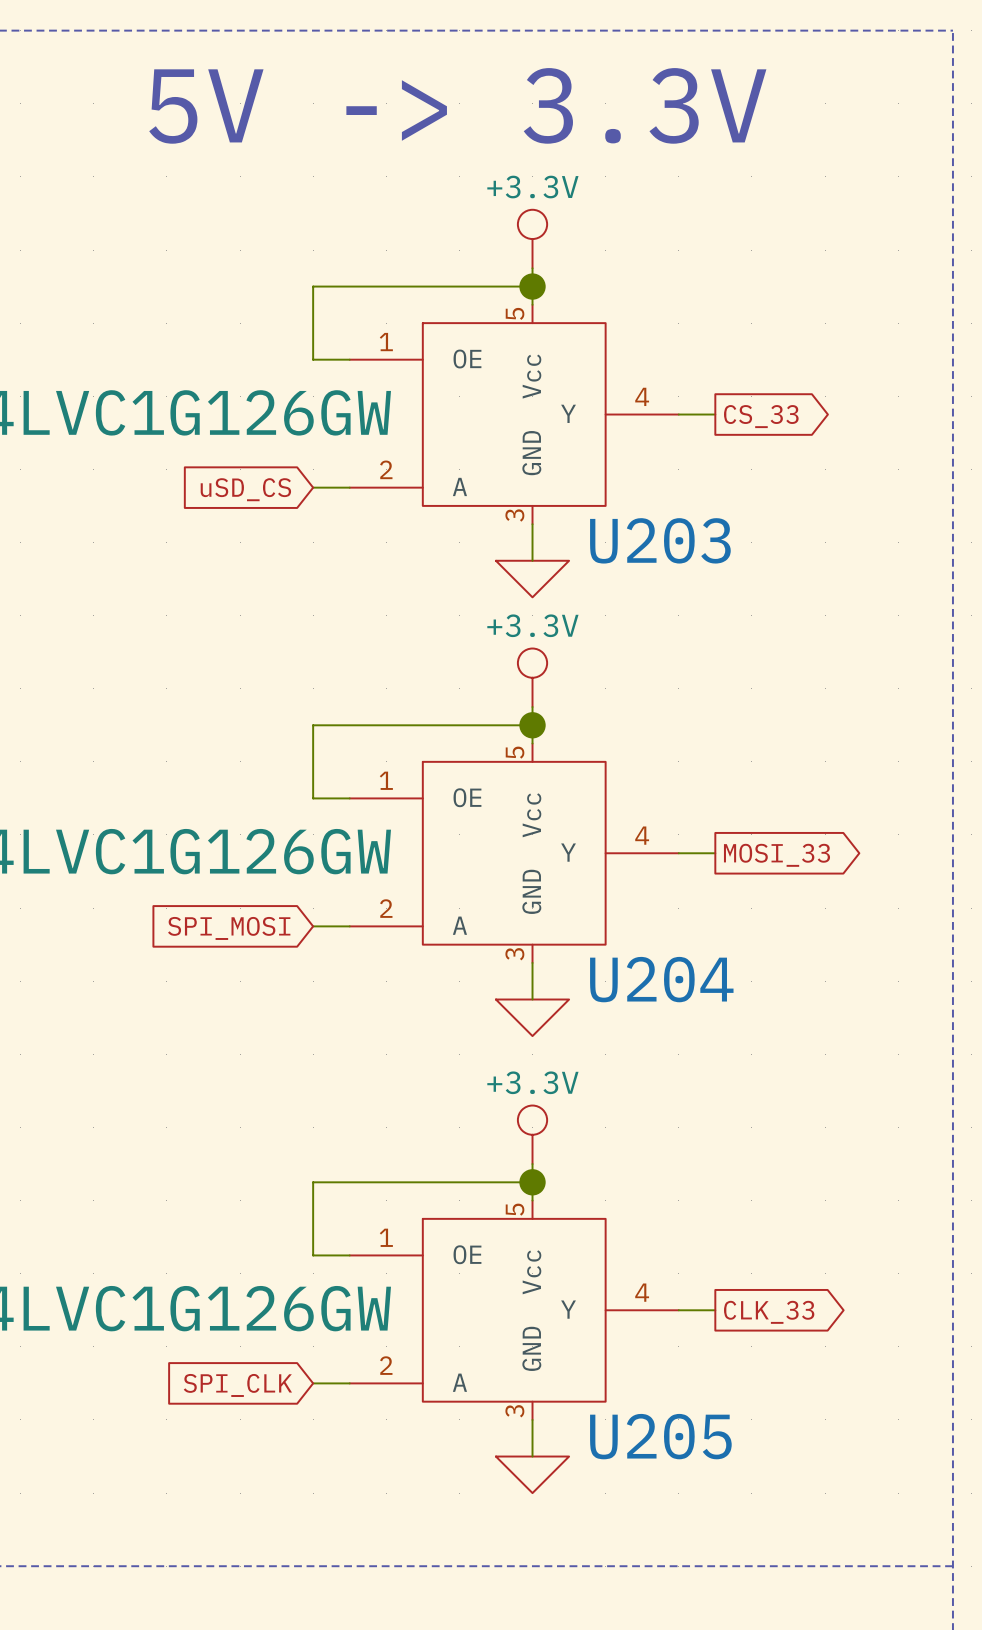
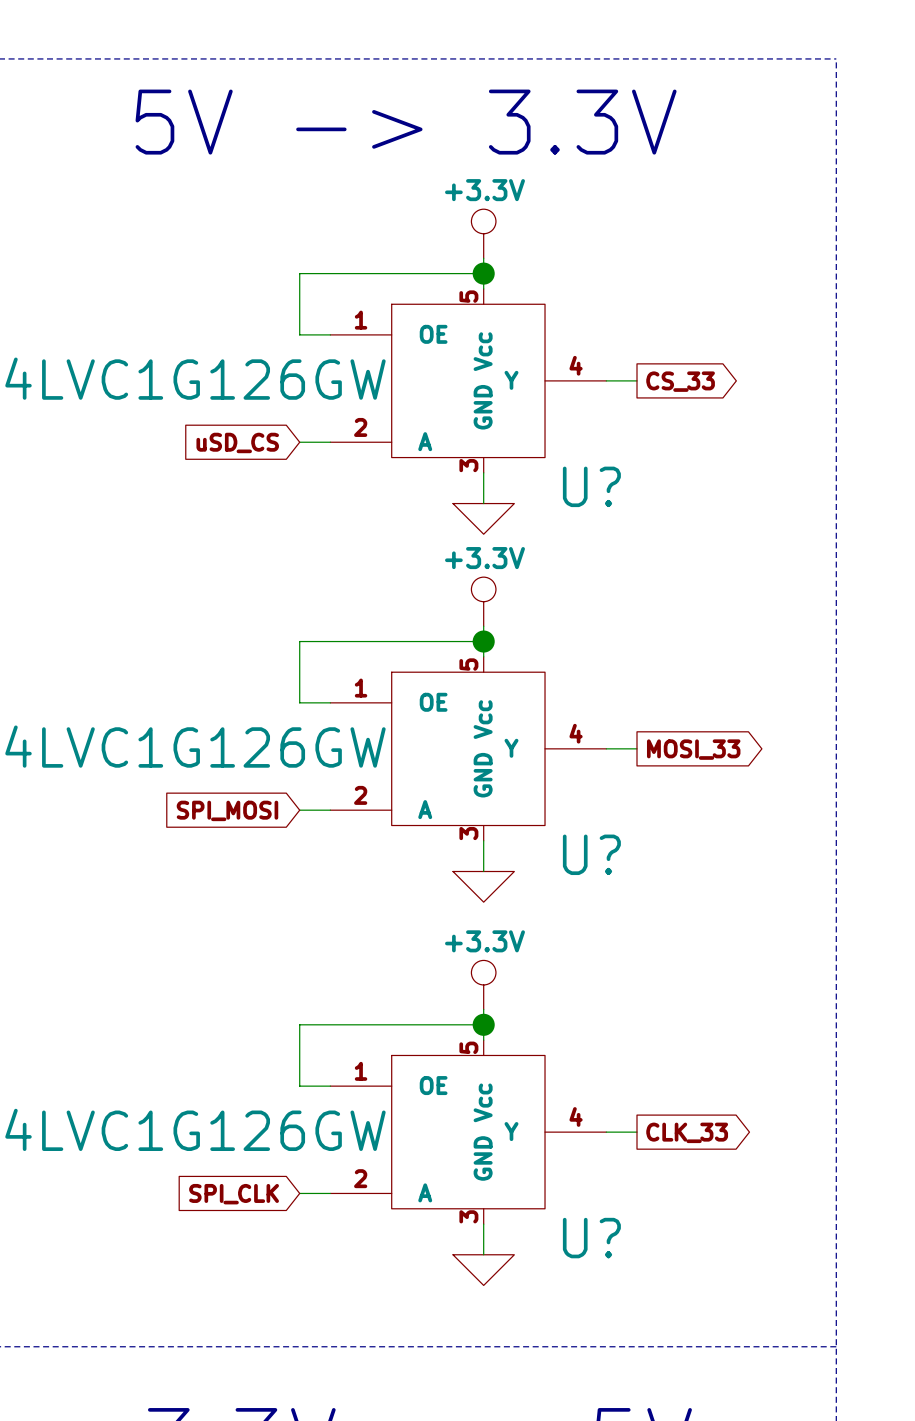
U203 name: U203 (660, 540) -> U? (591, 486)
U204 name: U204 (661, 979) -> U? (591, 854)
U205 name: U205 (660, 1436) -> U? (591, 1238)

